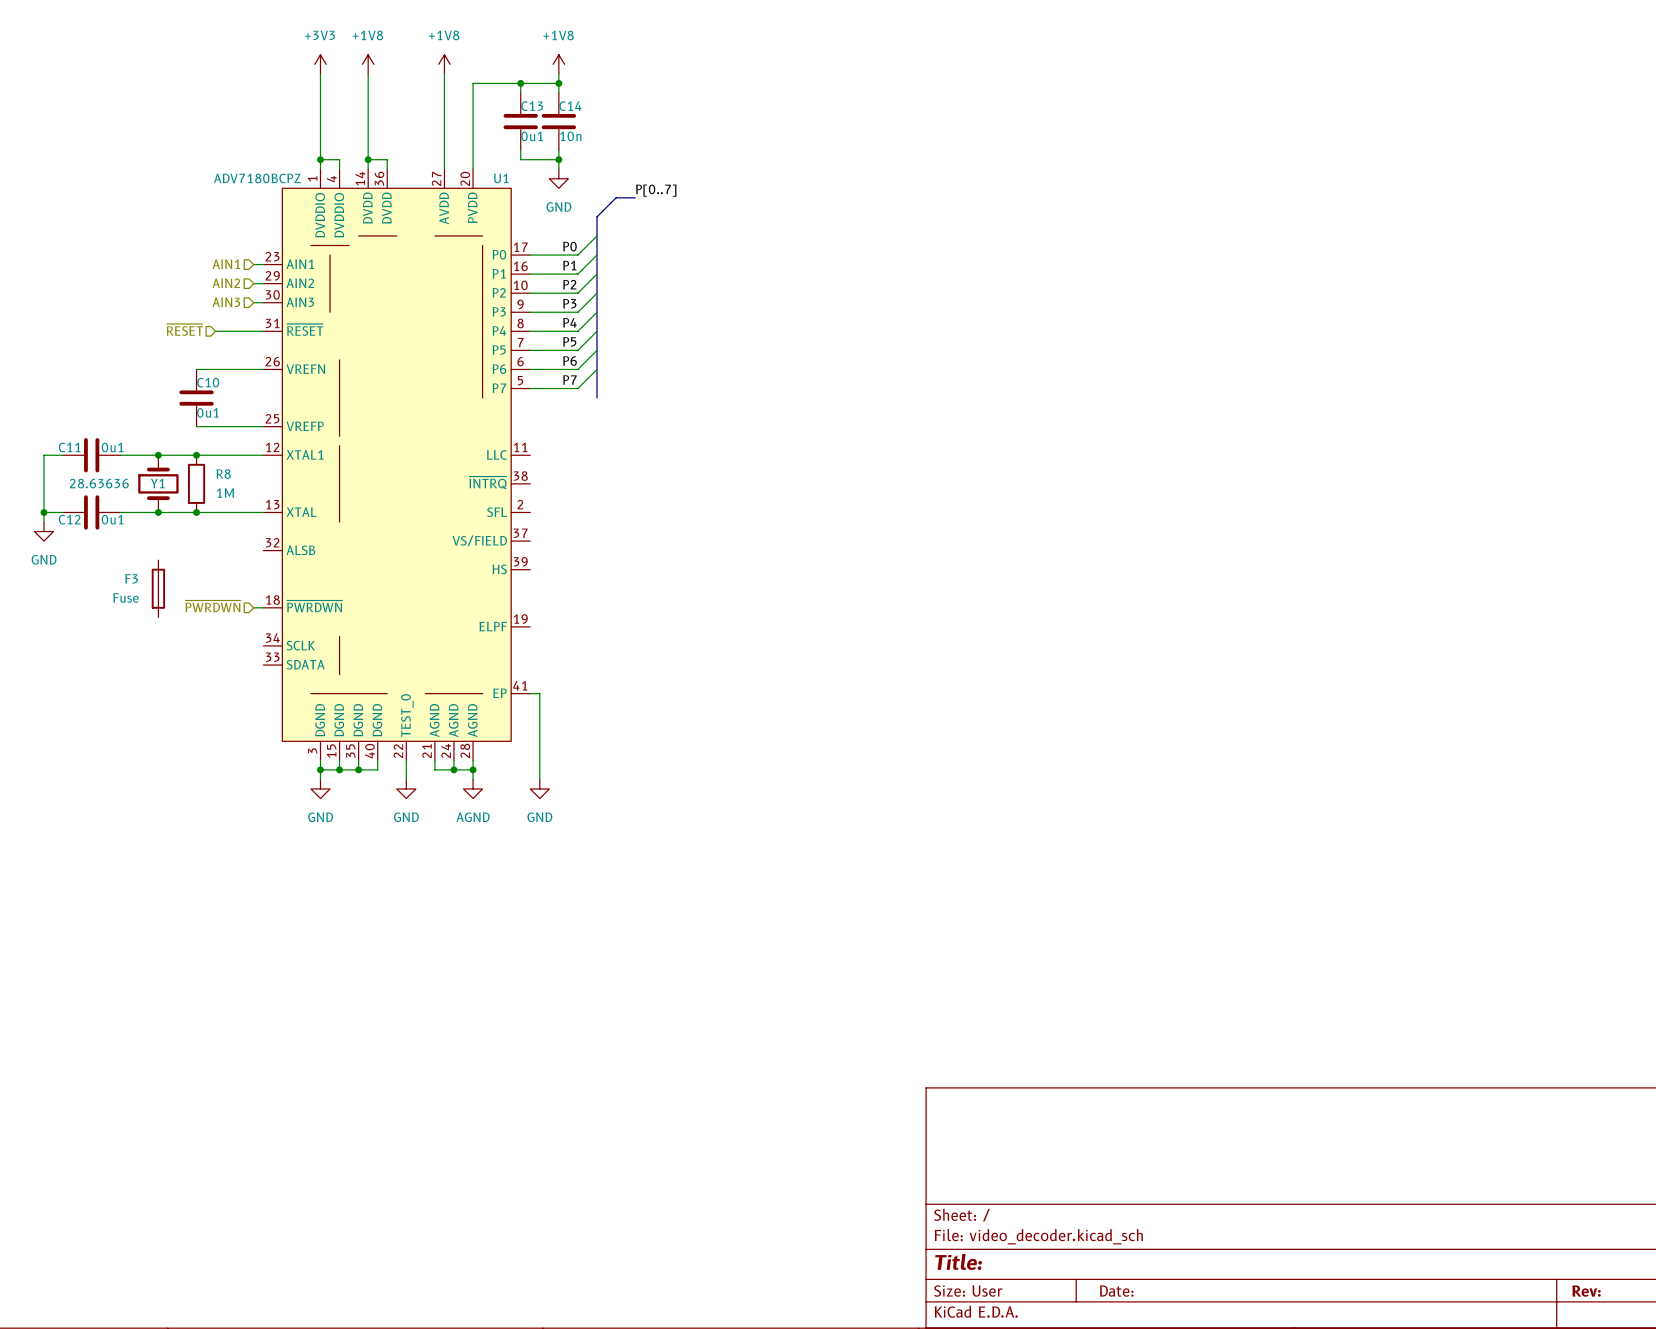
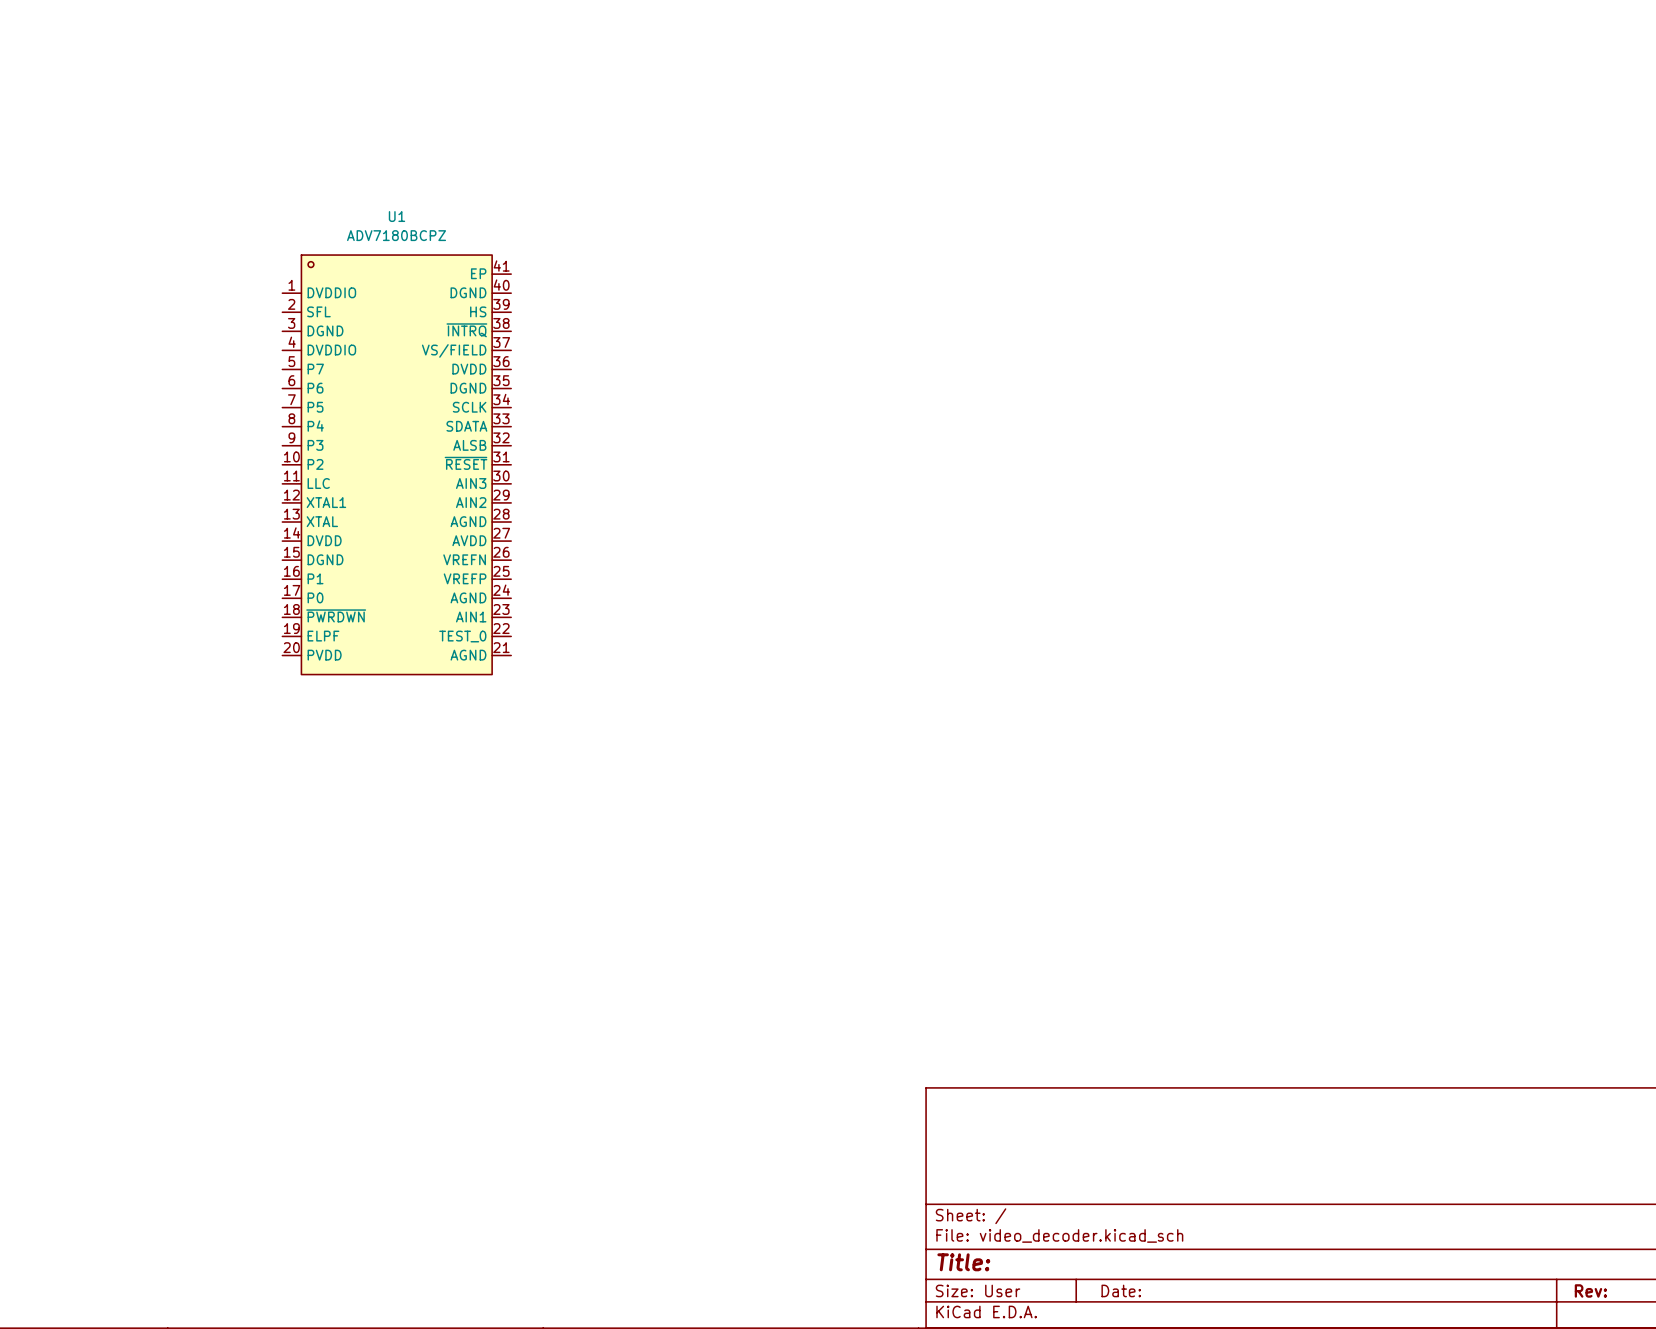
power symbol: +3V3 (320, 64) -> none
power symbol: +1V8 (368, 64) -> none
power symbol: +1V8 (444, 64) -> none
power symbol: +1V8 (558, 64) -> none
wire: (320, 73) (320, 169) -> none
wire: (368, 73) (368, 169) -> none
wire: (444, 73) (444, 169) -> none
wire: (558, 73) (558, 92) -> none
wire: (520, 83) (520, 92) -> none
junction: (520, 83) -> none
wire: (558, 83) (473, 83) (473, 169) -> none
junction: (558, 83) -> none
C13: 0u1 (520, 121) -> none
C14: 10n (558, 121) -> none
wire: (520, 150) (520, 159) (558, 159) -> none
wire: (558, 150) (558, 169) -> none
wire: (320, 159) (339, 159) (339, 169) -> none
junction: (320, 159) -> none
wire: (368, 159) (387, 159) (387, 169) -> none
junction: (368, 159) -> none
junction: (558, 159) -> none
U1 symbol: [263, 169, 531, 761] -> [282, 255, 512, 675]
U1 value position: ADV7180BCPZ (257, 178) -> ADV7180BCPZ (396, 235)
U1 name position: U1 (501, 178) -> U1 (397, 216)
power symbol: GND (558, 178) -> none
label: P[0..7] (656, 190) -> none
bus: (635, 197) (616, 197) (597, 216) (597, 398) -> none
wire: (597, 235) (577, 255) (530, 255) -> none
label: P0 (569, 246) -> none
wire: (597, 255) (577, 274) (530, 274) -> none
hierarchical label: AIN1 (226, 264) -> none
wire: (253, 264) (263, 264) -> none
label: P1 (569, 265) -> none
wire: (597, 274) (577, 293) (530, 293) -> none
hierarchical label: AIN2 (226, 283) -> none
wire: (253, 283) (263, 283) -> none
label: P2 (569, 284) -> none
wire: (597, 293) (577, 312) (530, 312) -> none
hierarchical label: AIN3 (226, 302) -> none
wire: (253, 302) (263, 302) -> none
label: P3 (569, 303) -> none
wire: (597, 312) (577, 331) (530, 331) -> none
label: P4 (569, 322) -> none
hierarchical label: ~{RESET} (184, 329) -> none
wire: (215, 331) (263, 331) -> none
wire: (597, 331) (577, 350) (530, 350) -> none
label: P5 (569, 341) -> none
wire: (597, 350) (577, 369) (530, 369) -> none
label: P6 (570, 361) -> none
wire: (196, 369) (263, 369) -> none
wire: (597, 369) (577, 388) (530, 388) -> none
label: P7 (569, 380) -> none
C10: 0u1 (196, 398) -> none
wire: (196, 426) (263, 426) -> none
wire: (63, 455) (43, 455) (43, 522) -> none
C11: 0u1 (91, 455) -> none
wire: (120, 455) (263, 455) -> none
junction: (158, 455) -> none
junction: (196, 455) -> none
Y1: 28.63636 (158, 483) -> none
R8: 1M (196, 483) -> none
wire: (43, 512) (63, 512) -> none
junction: (43, 512) -> none
C12: 0u1 (91, 512) -> none
wire: (120, 512) (263, 512) -> none
junction: (158, 512) -> none
junction: (196, 512) -> none
power symbol: GND (43, 531) -> none
F3: Fuse (158, 588) -> none
hierarchical label: ~{PWRDWN} (213, 606) -> none
wire: (253, 607) (263, 607) -> none
wire: (530, 693) (539, 693) (539, 779) -> none
wire: (320, 760) (320, 779) -> none
wire: (339, 760) (339, 769) -> none
wire: (358, 760) (358, 769) -> none
wire: (377, 760) (377, 769) (320, 769) -> none
wire: (406, 760) (406, 779) -> none
wire: (434, 760) (434, 769) (473, 769) -> none
wire: (453, 760) (453, 769) -> none
wire: (473, 760) (473, 779) -> none
junction: (320, 769) -> none
junction: (339, 769) -> none
junction: (358, 769) -> none
junction: (453, 769) -> none
junction: (473, 769) -> none
power symbol: GND (320, 788) -> none
power symbol: GND (406, 788) -> none
power symbol: AGND (473, 788) -> none
power symbol: GND (539, 788) -> none

